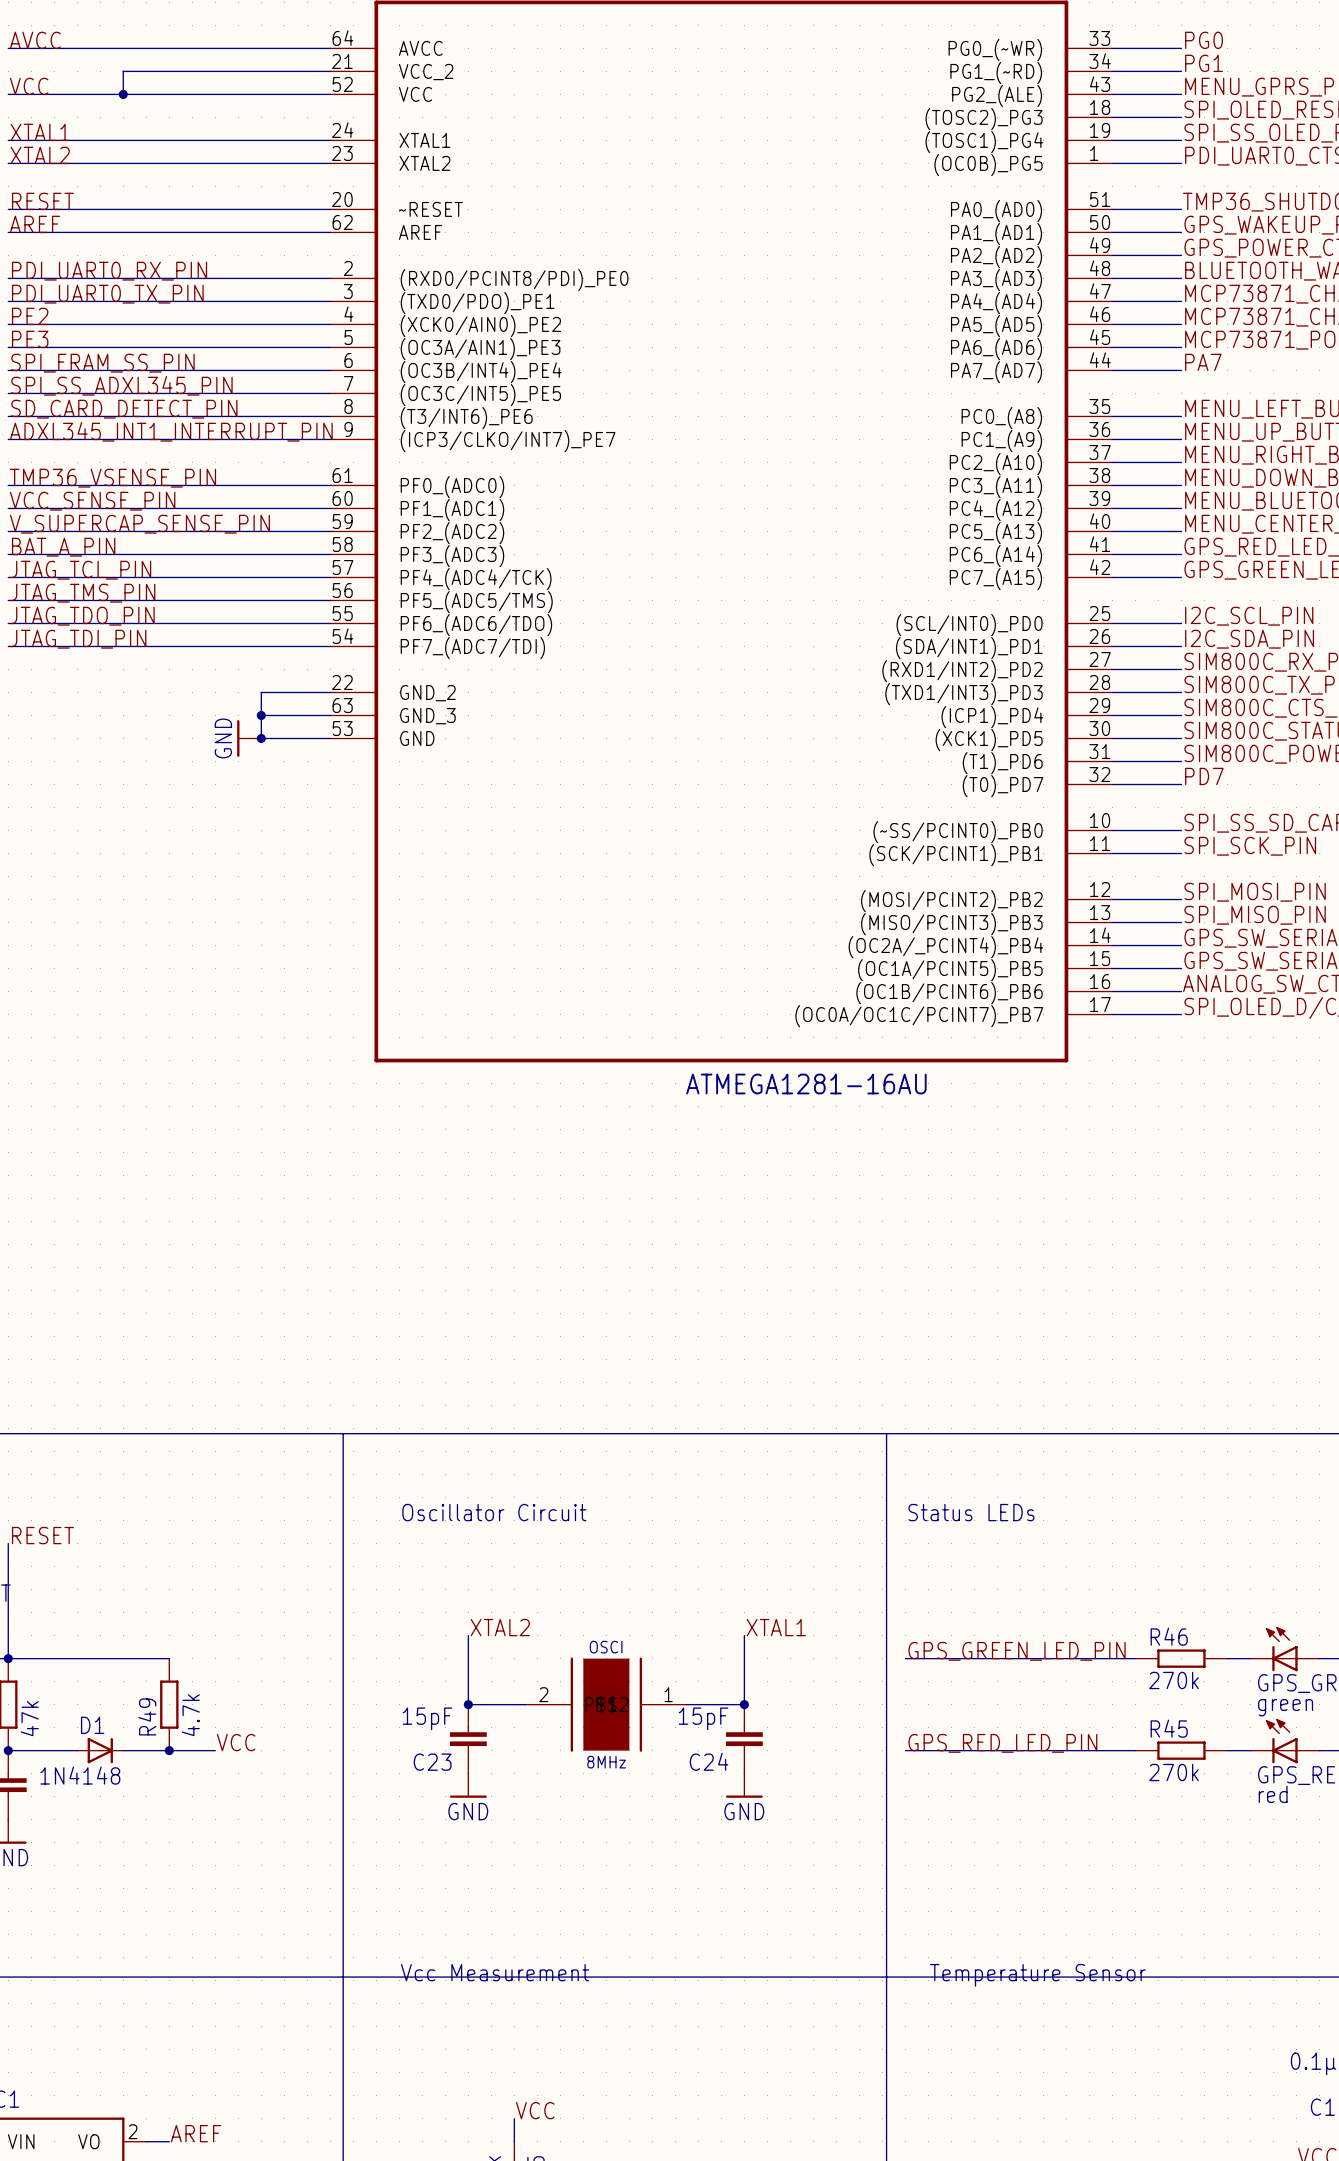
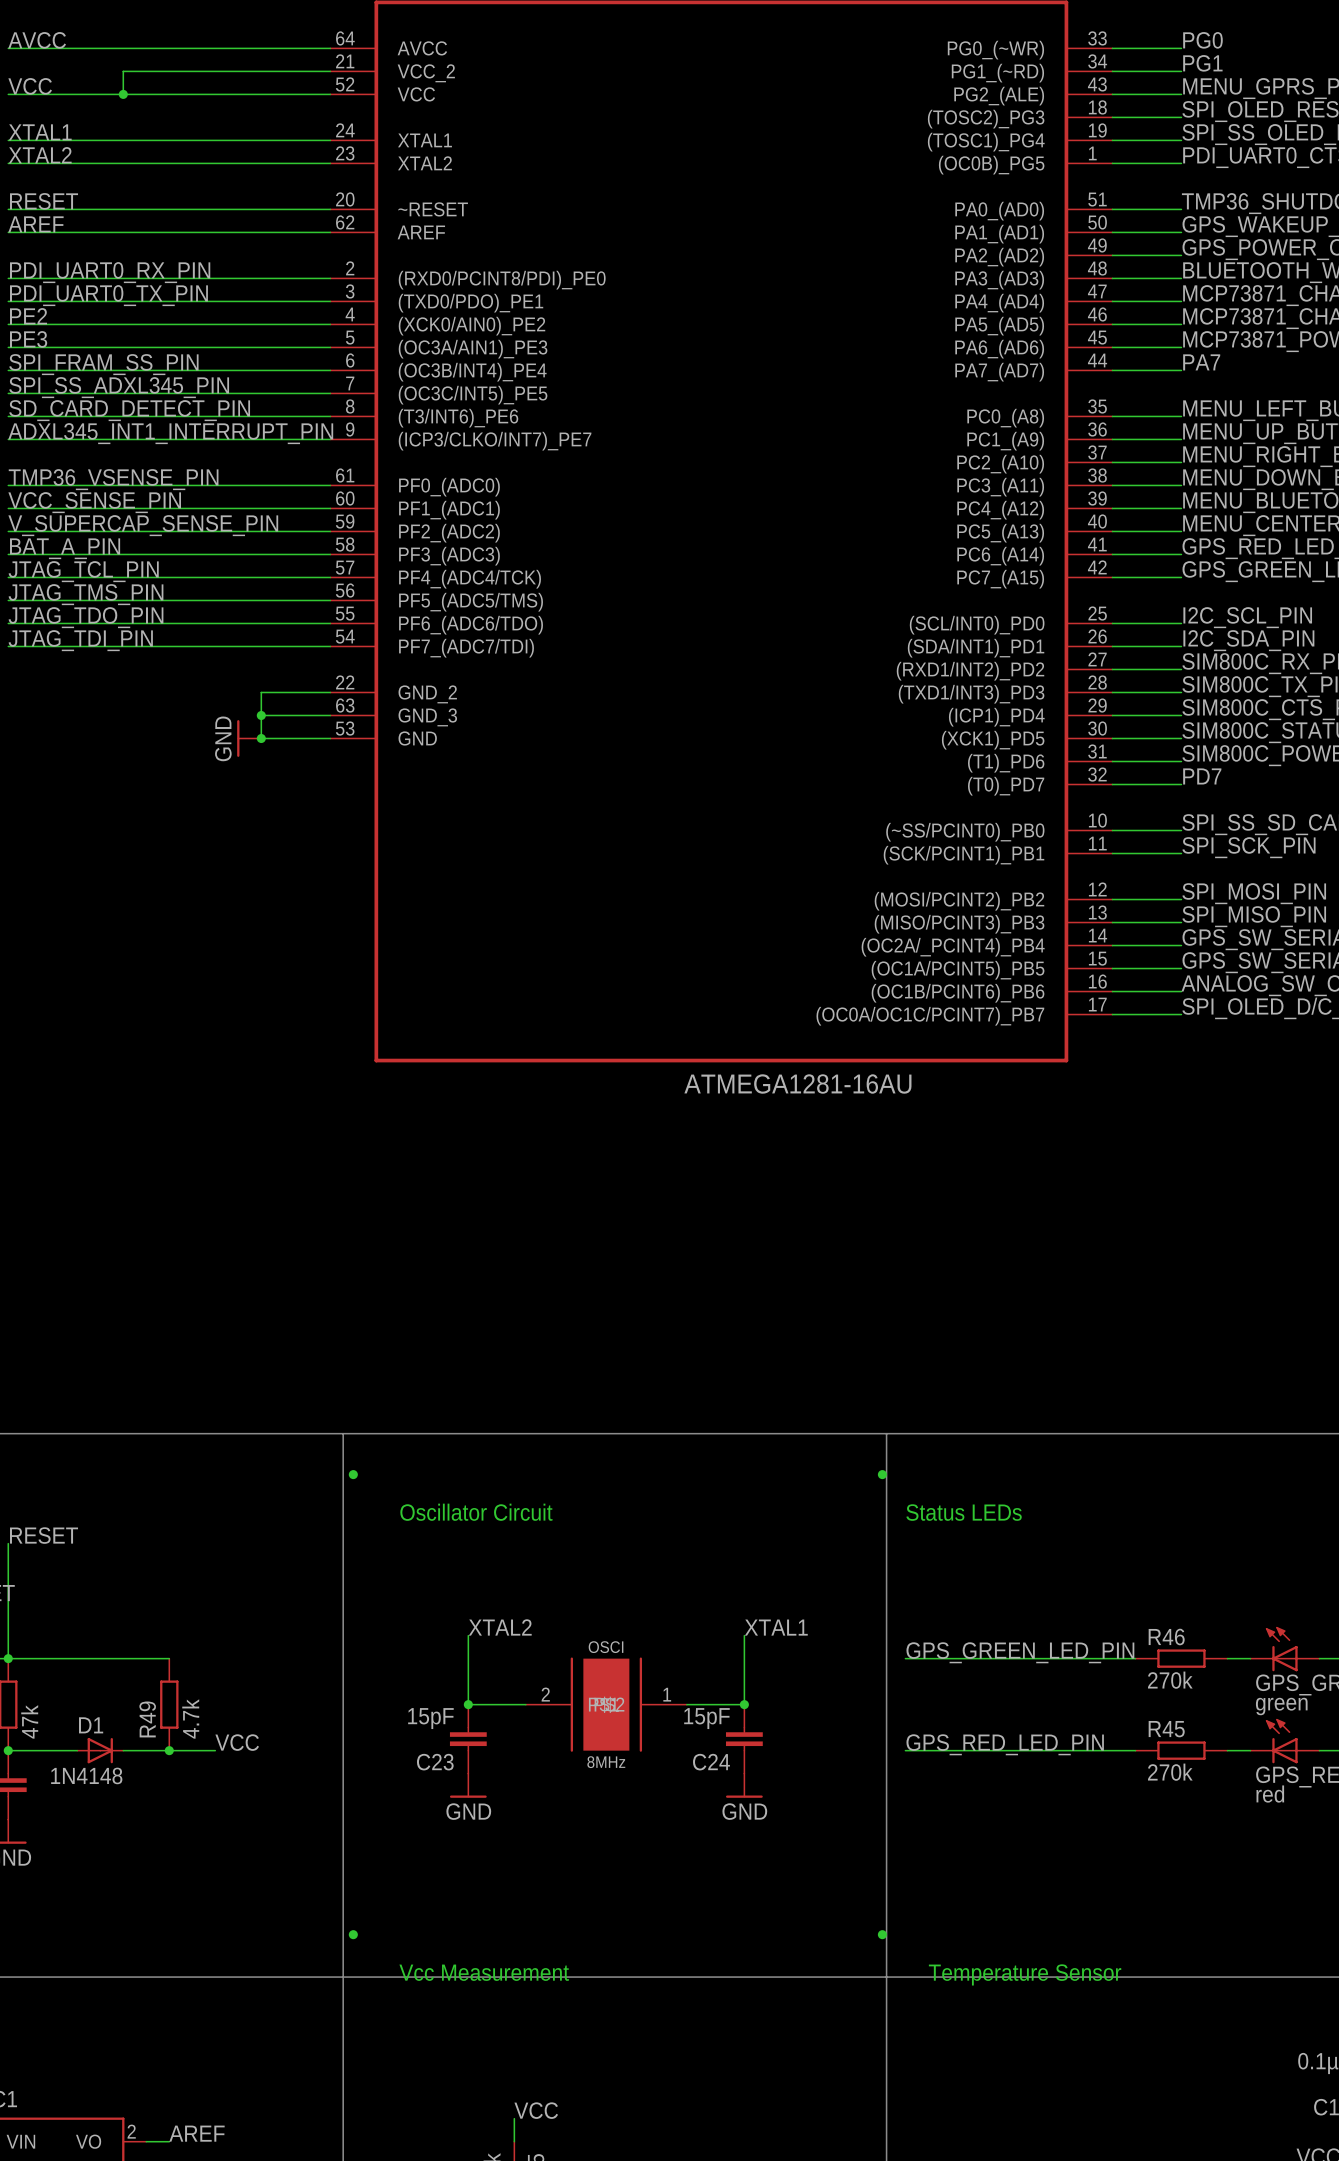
junction: none -> (353, 1474)
junction: none -> (882, 1474)
junction: none -> (353, 1934)
junction: none -> (882, 1934)

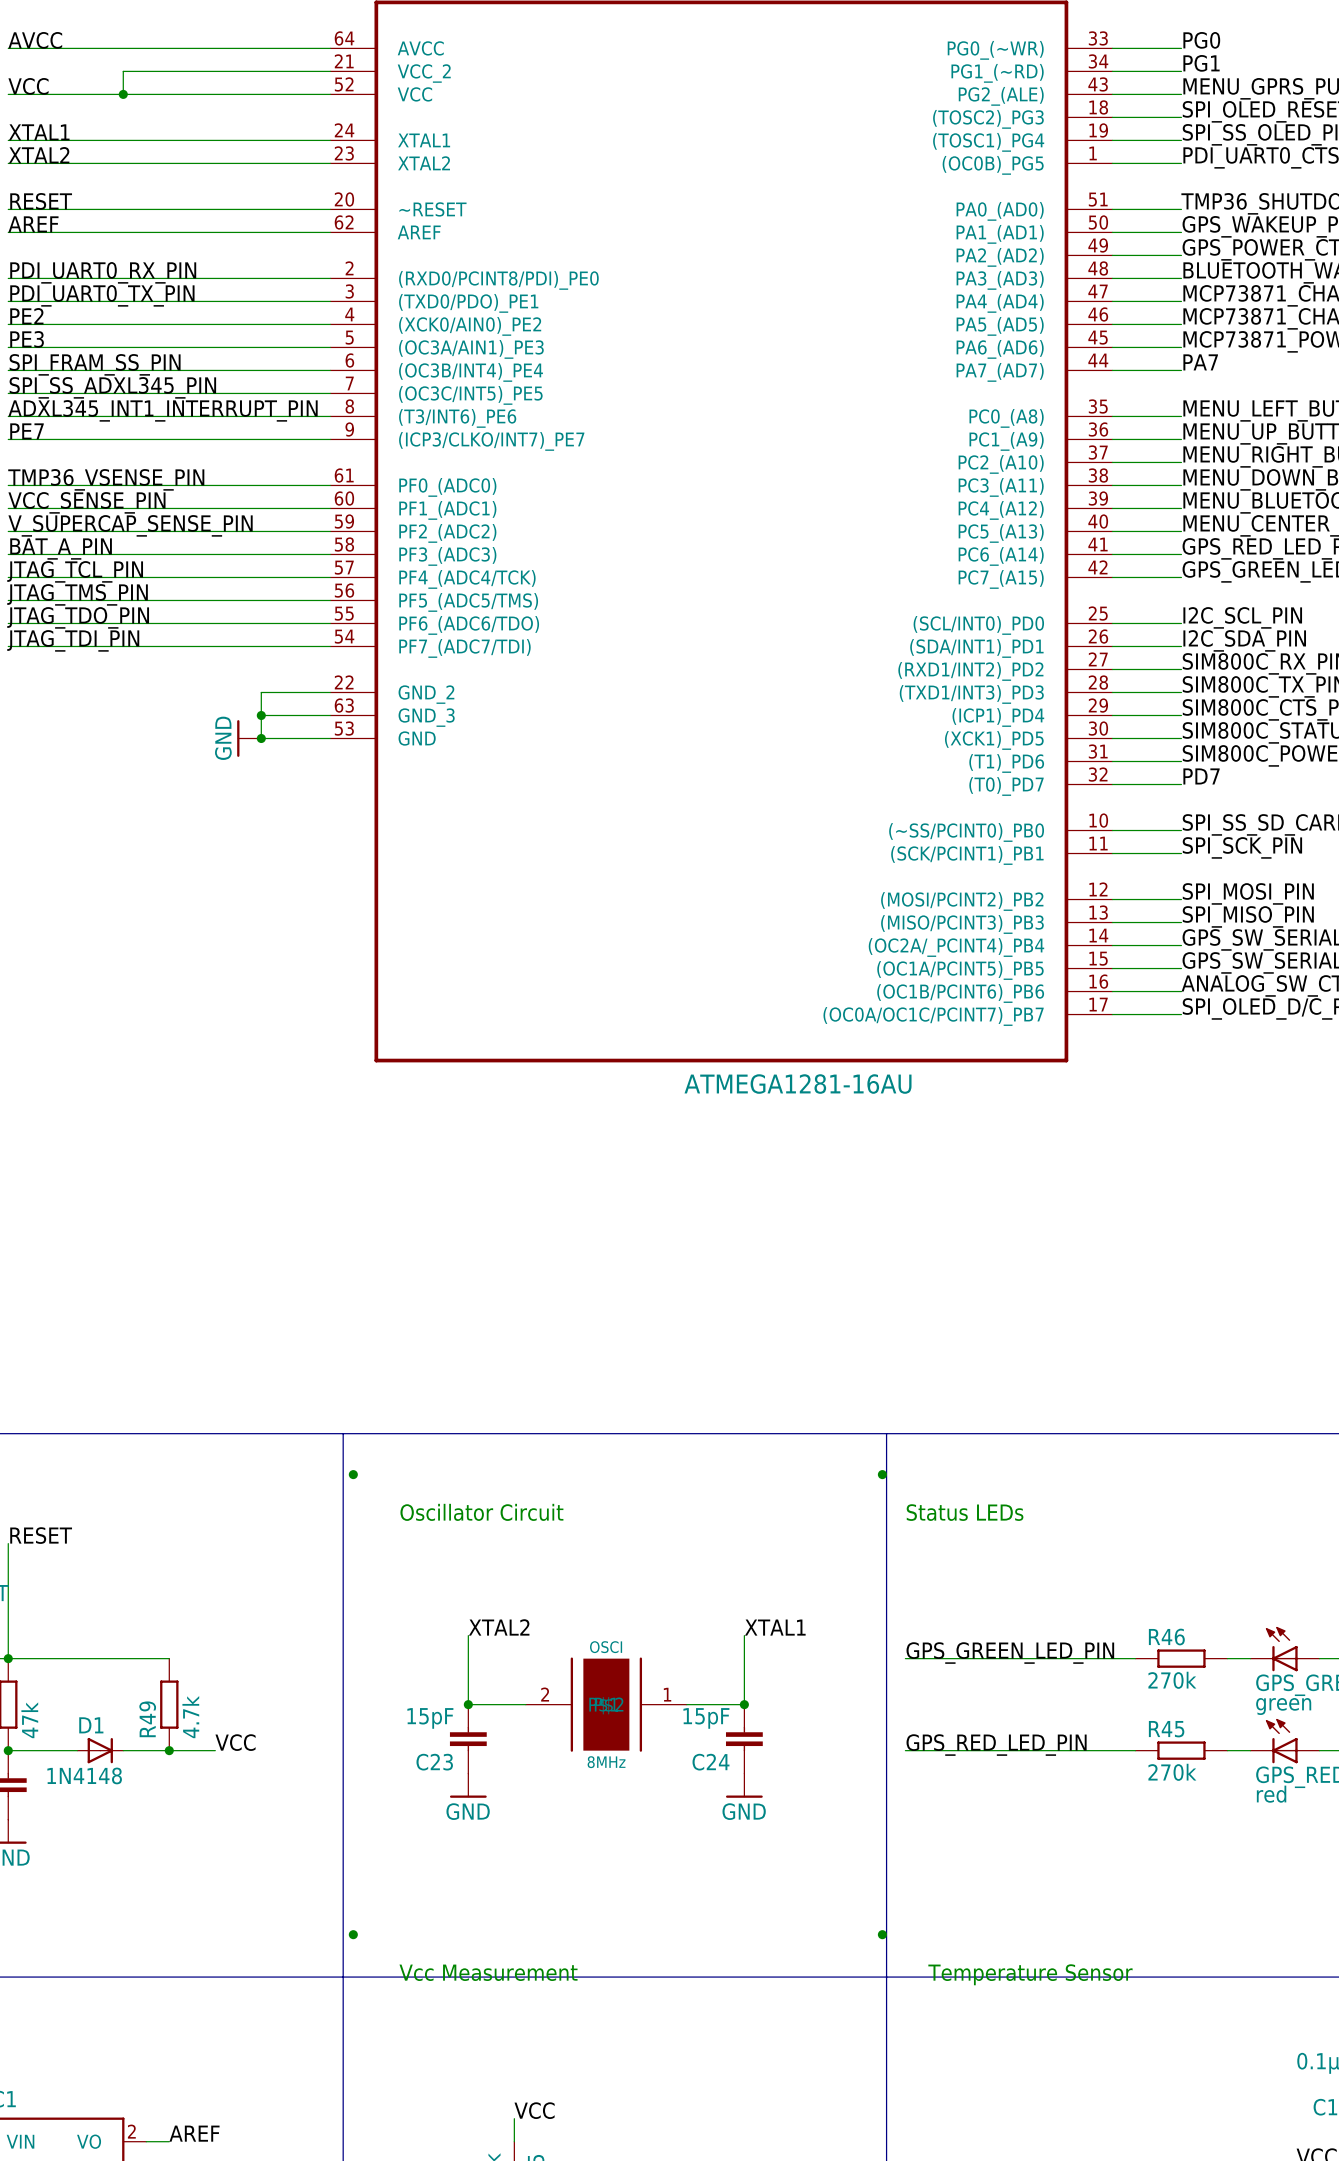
label: SD_CARD_DETECT_PIN (129, 410) -> ADXL345_INT1_INTERRUPT_PIN (163, 410)
label: ADXL345_INT1_INTERRUPT_PIN (170, 433) -> PE7 (27, 431)

